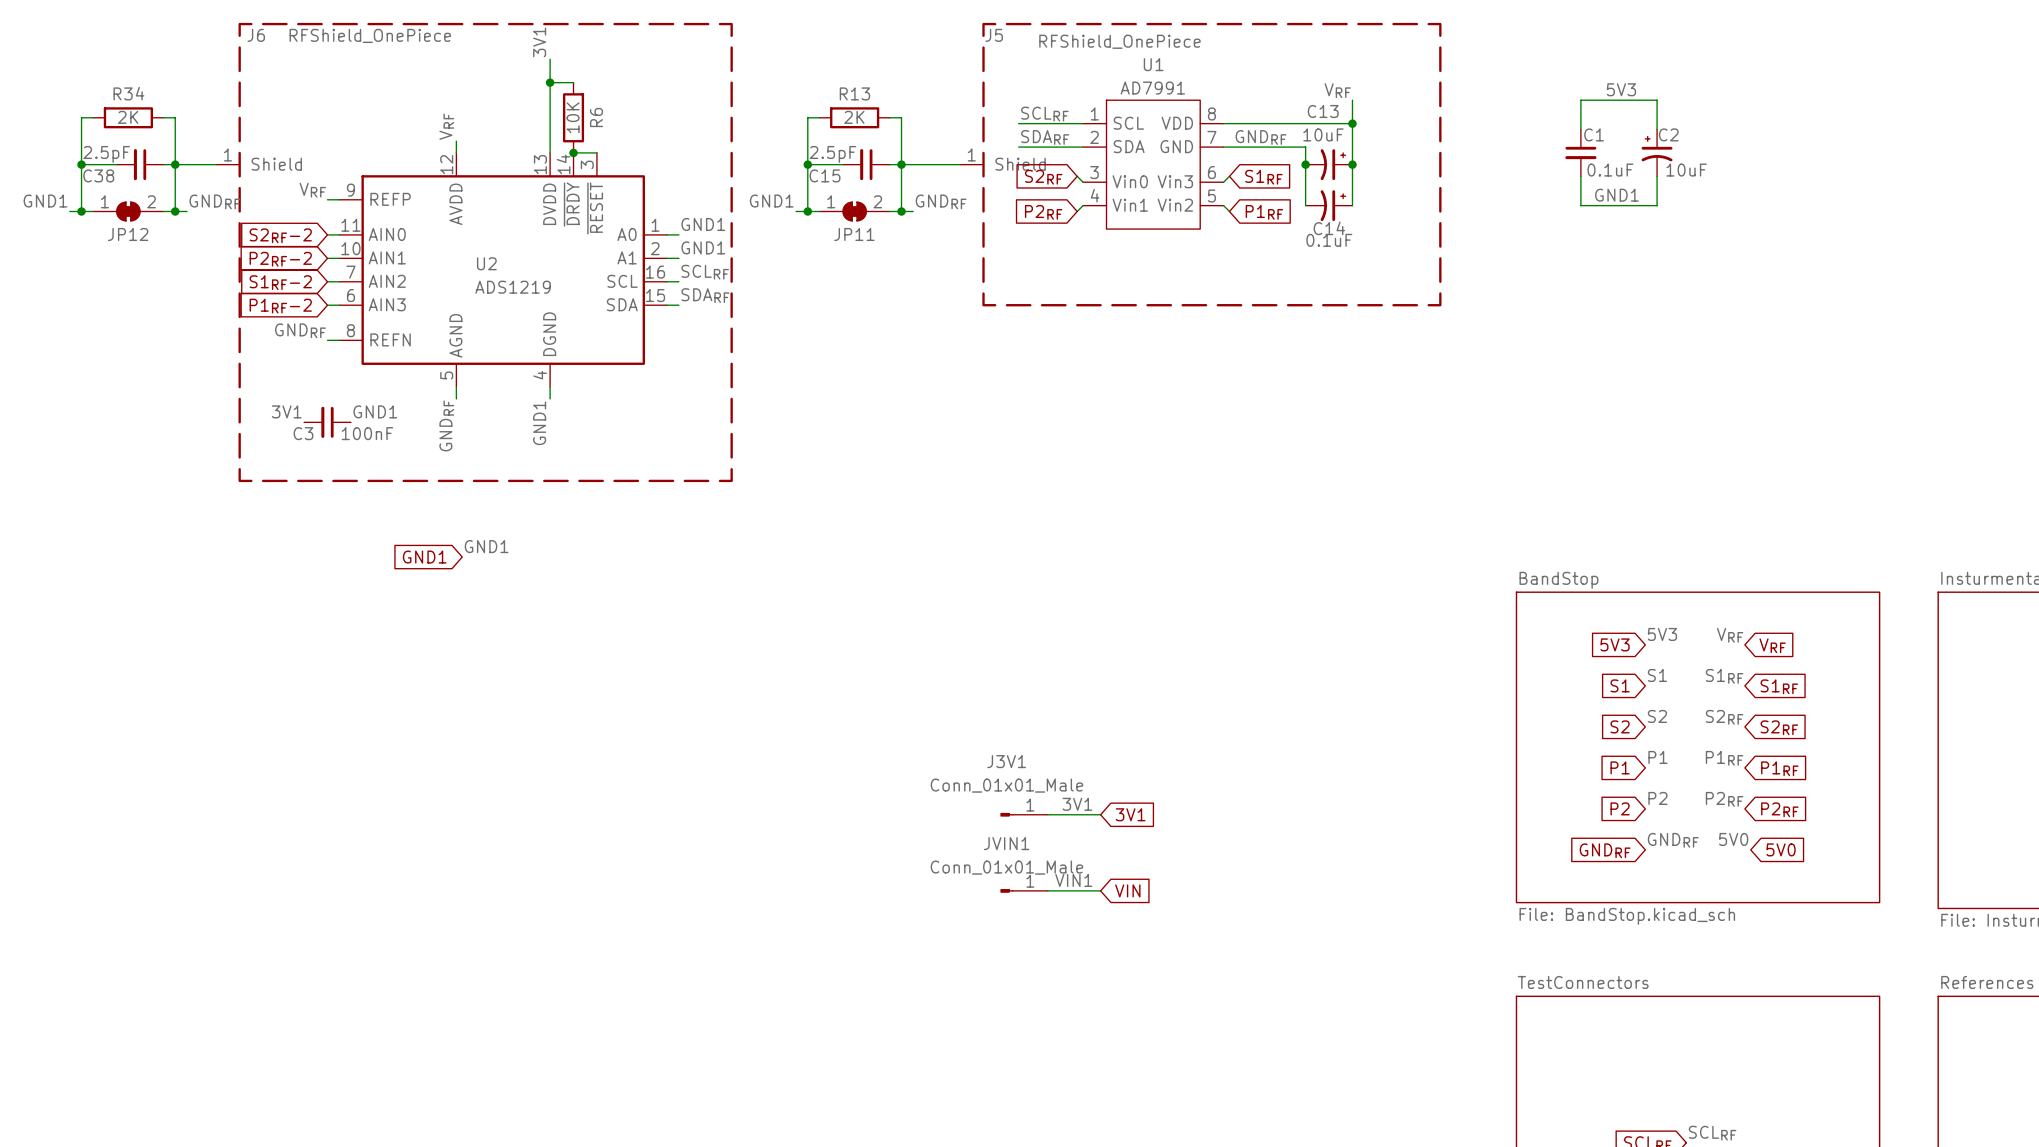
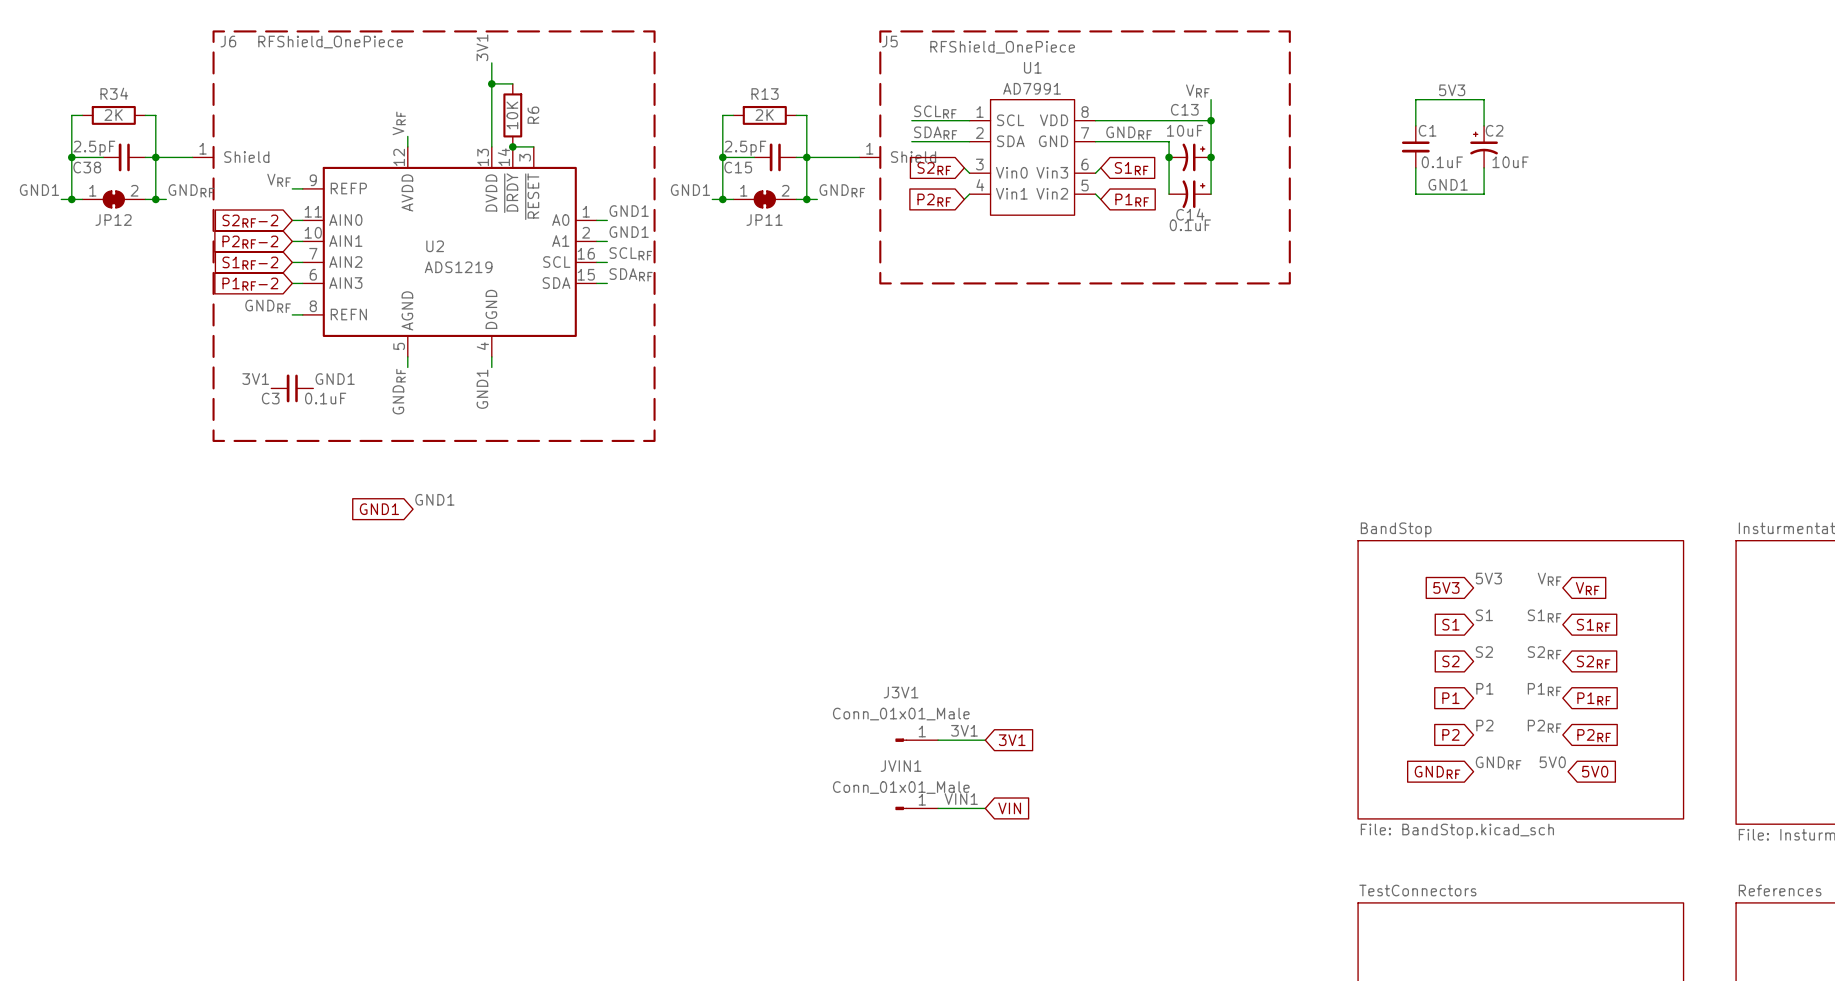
C3 value: 100nF (367, 433) -> 0.1uF (325, 398)

